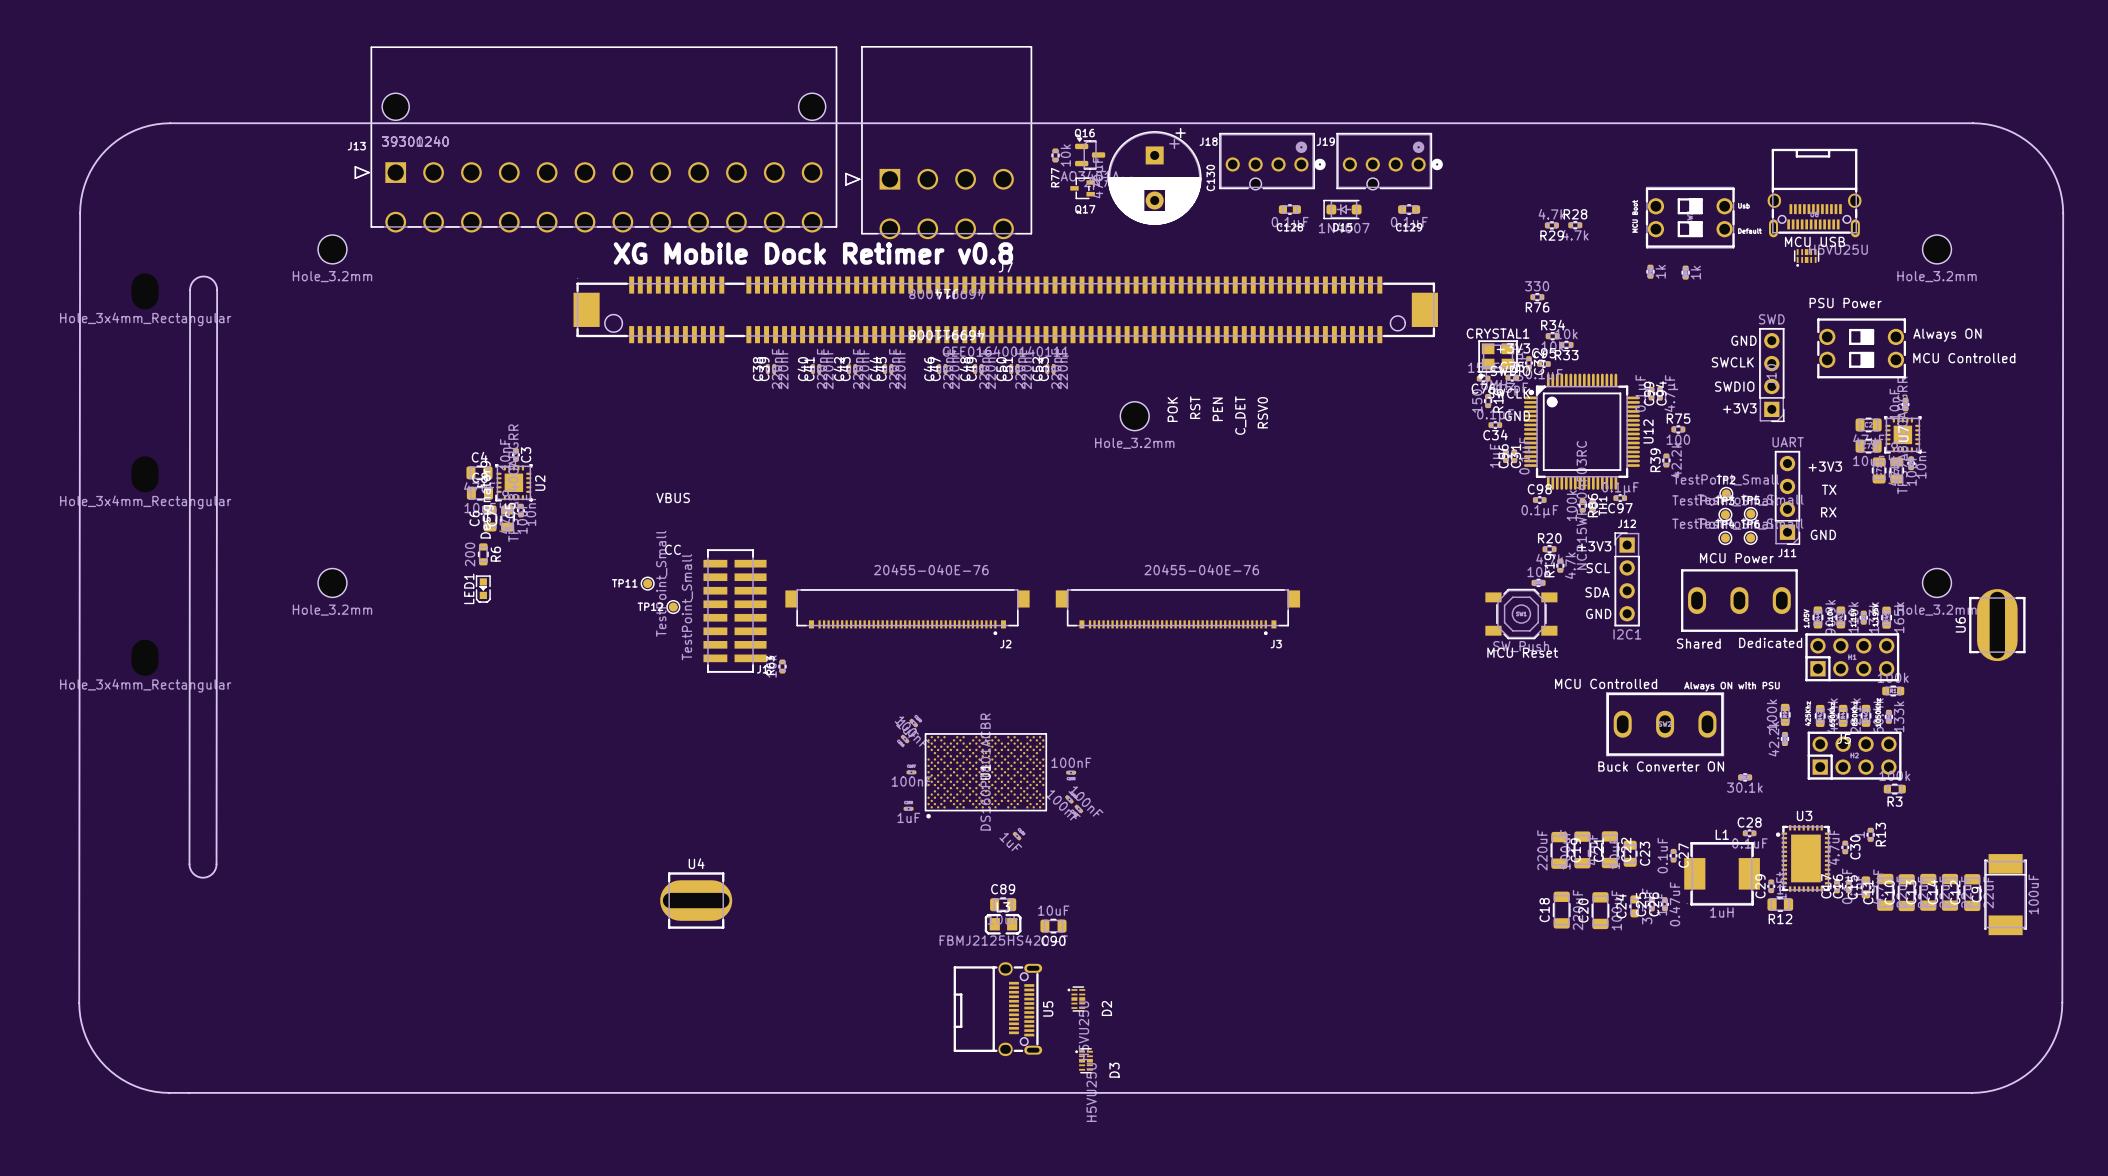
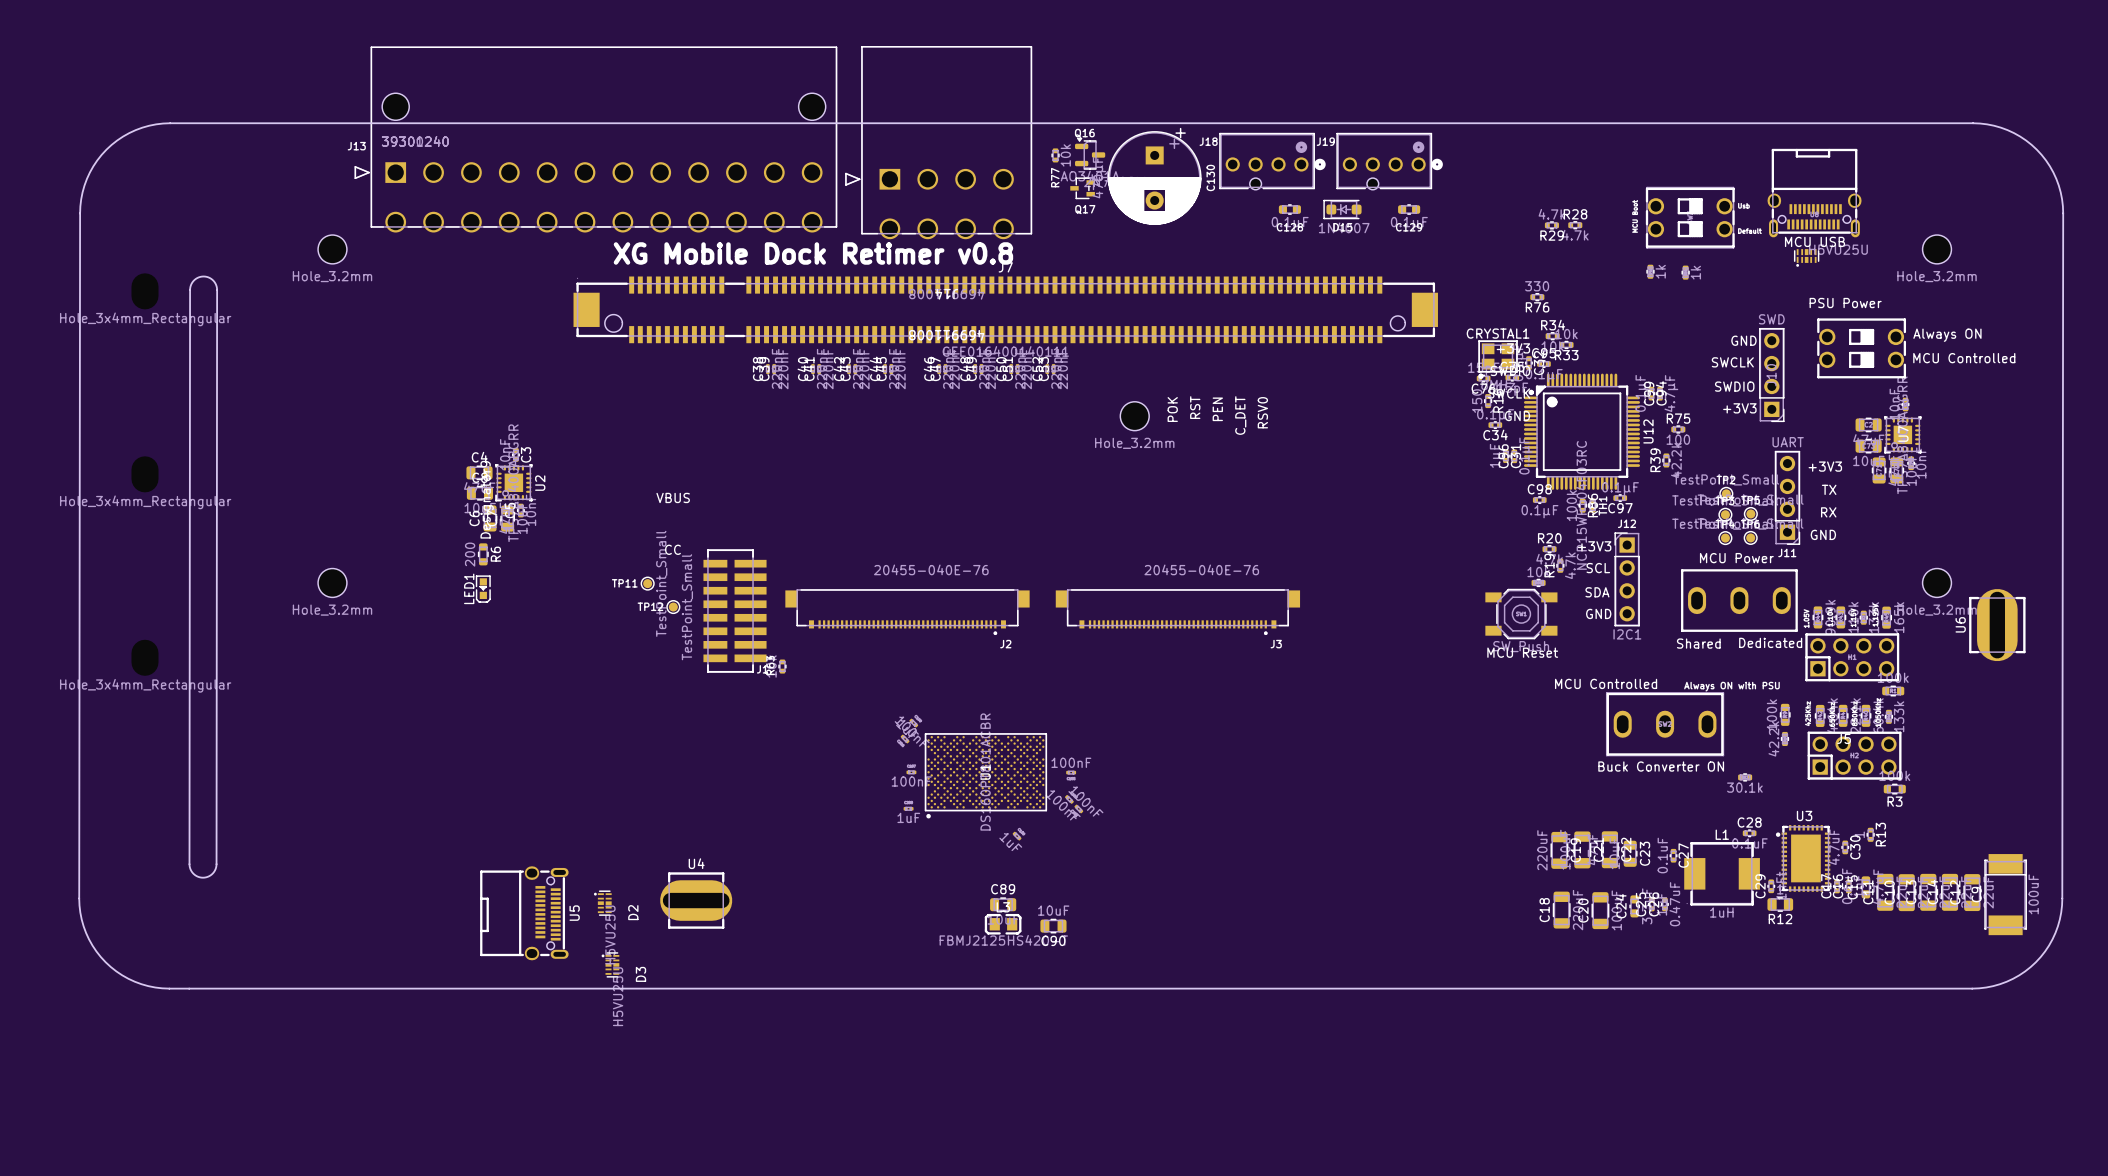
board edge: (80, 213) (79, 1009) (86, 1037) (96, 1055) (105, 1066) (122, 1079) (134, 1086) (148, 1090) (169, 1092) (1972, 1092) (1993, 1090) (2013, 1083) (2030, 1071) (2049, 1049) (2057, 1030) (2062, 1009) (2063, 213) -> (80, 213) (79, 905) (83, 926) (89, 939) (100, 957) (110, 967) (122, 975) (141, 984) (169, 988) (1972, 988) (1986, 987) (2006, 981) (2030, 967) (2045, 951) (2055, 932) (2062, 905) (2063, 213)
D2 position: (1076, 999) -> (602, 903)
U5 position: (997, 1009) -> (524, 913)
D3 position: (1084, 1060) -> (610, 964)

